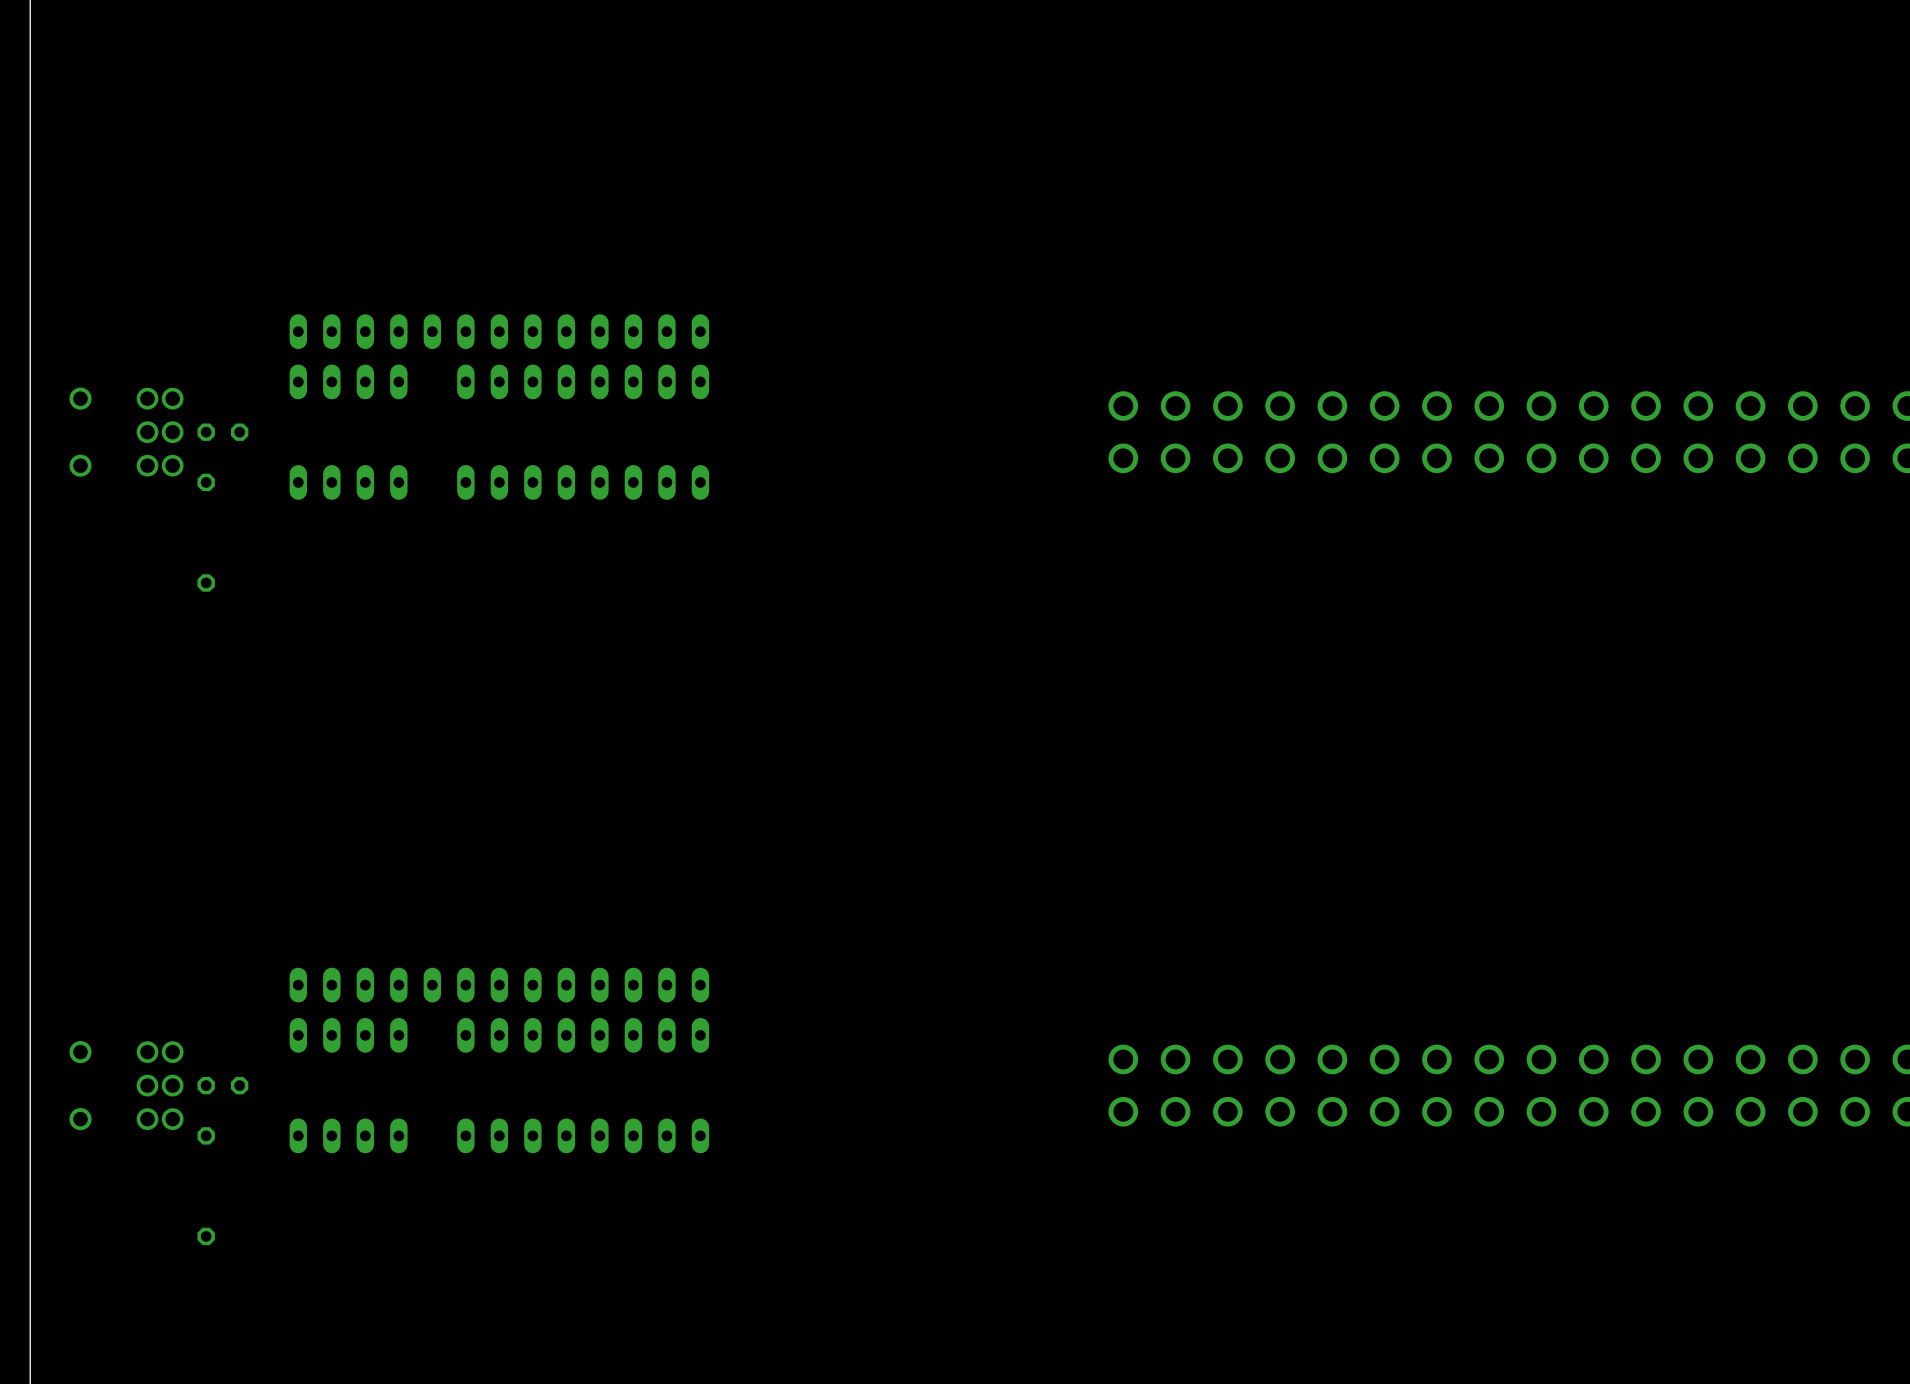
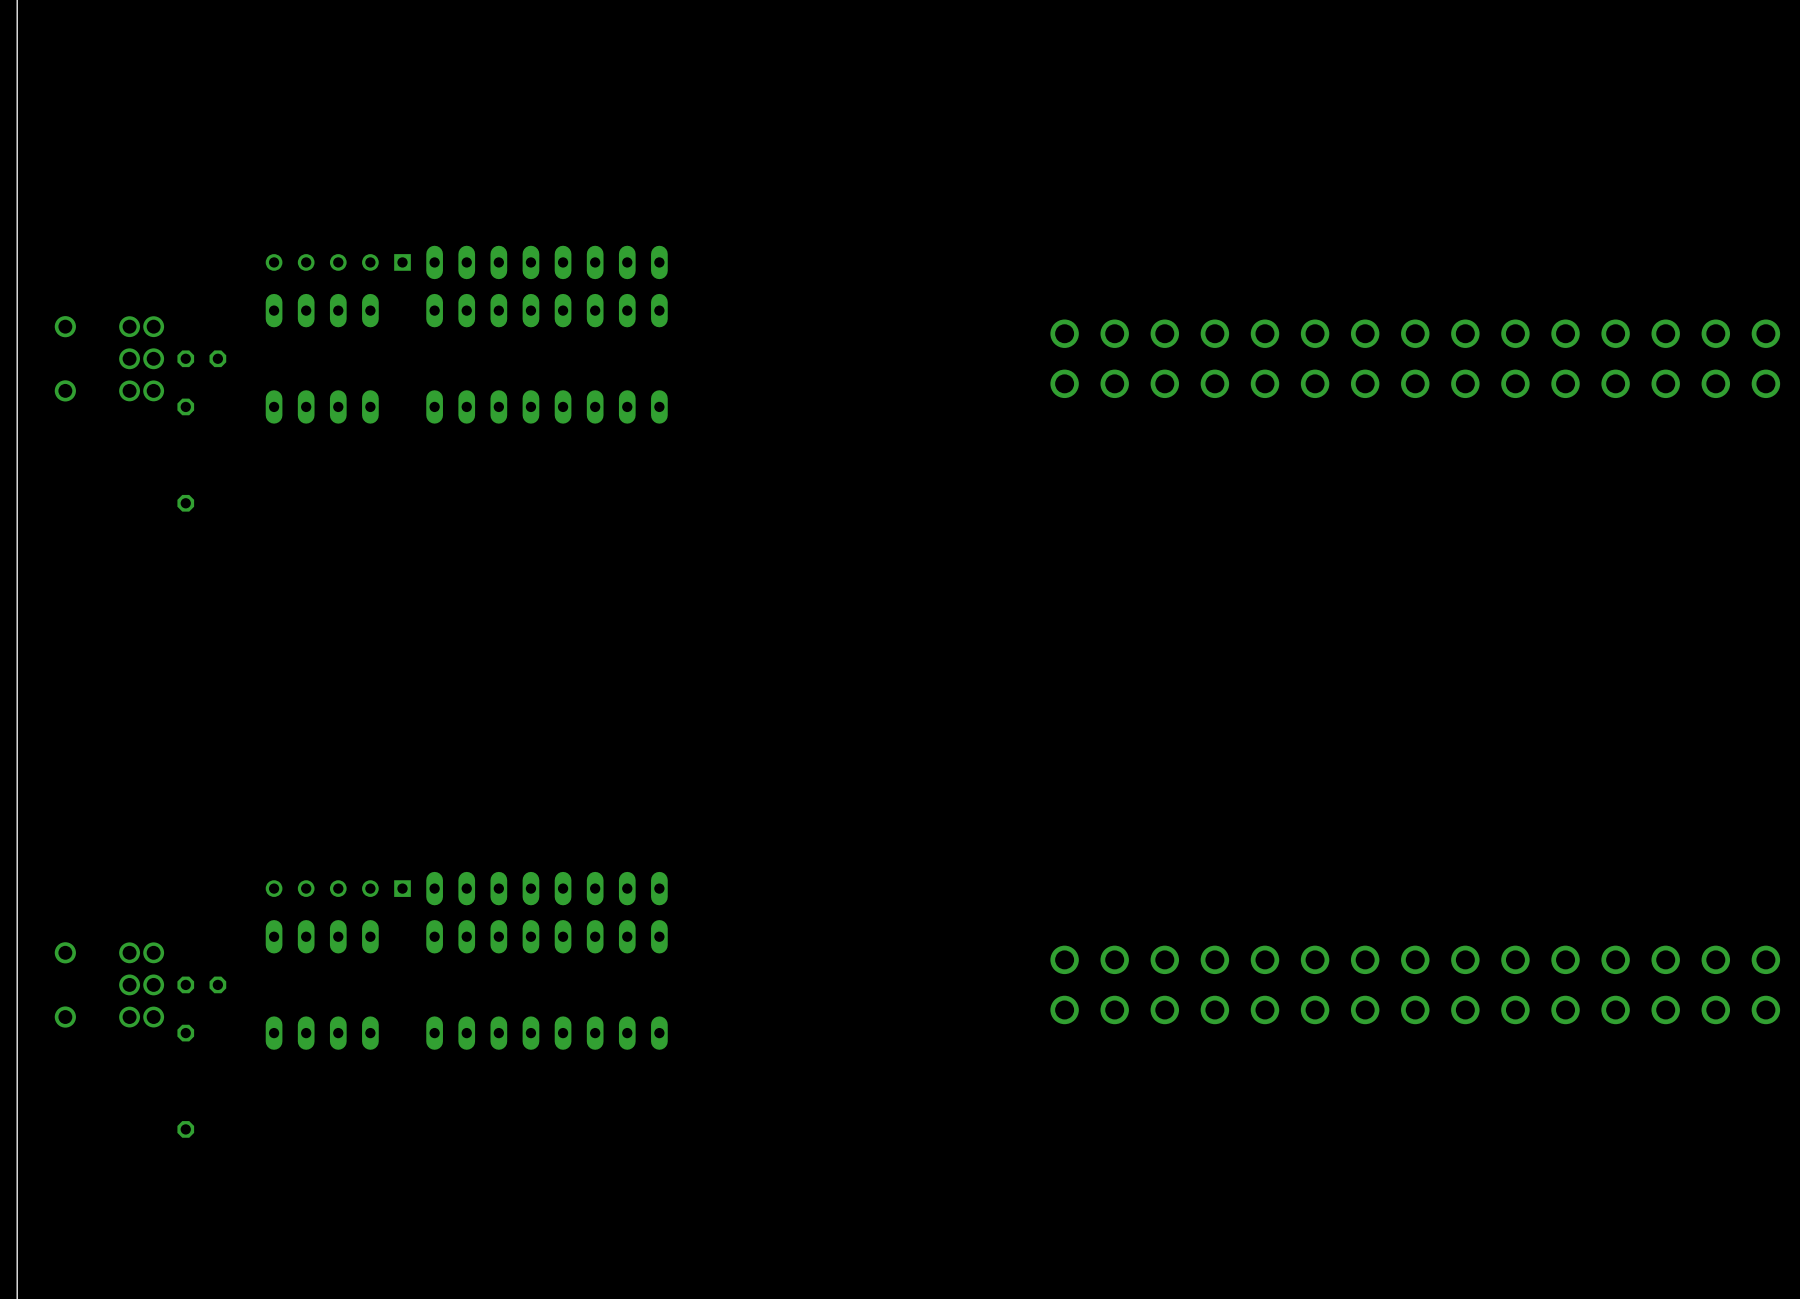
part footprint: [289, 314, 442, 350] -> [265, 254, 411, 271]
part footprint: [289, 967, 442, 1003] -> [265, 880, 411, 897]

